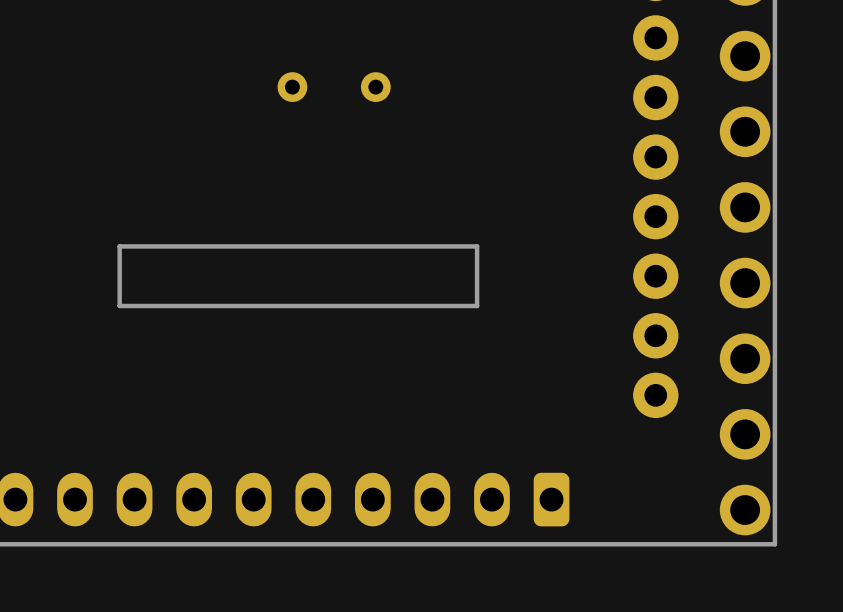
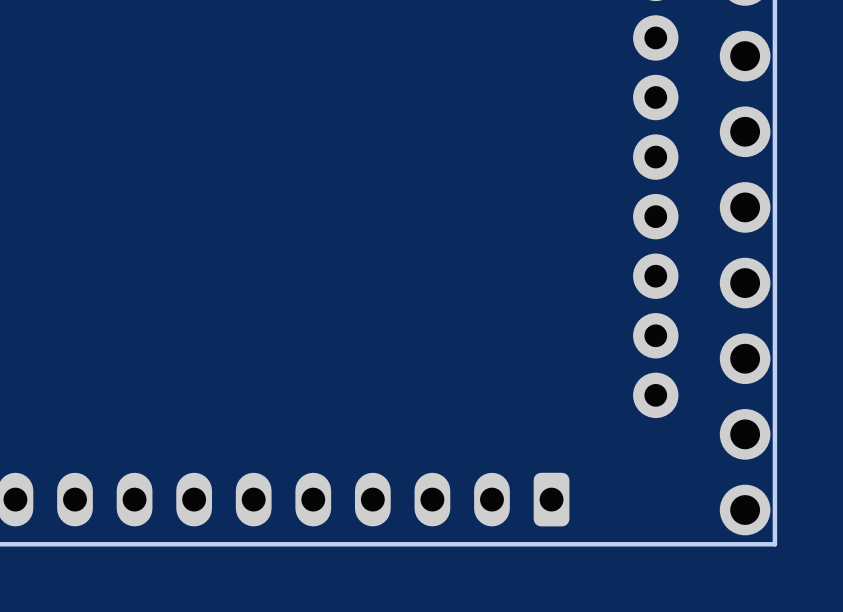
part: (292, 87) -> none
part: (375, 87) -> none
board edge: (477, 246) (477, 305) (119, 305) (119, 246) (477, 246) -> none

